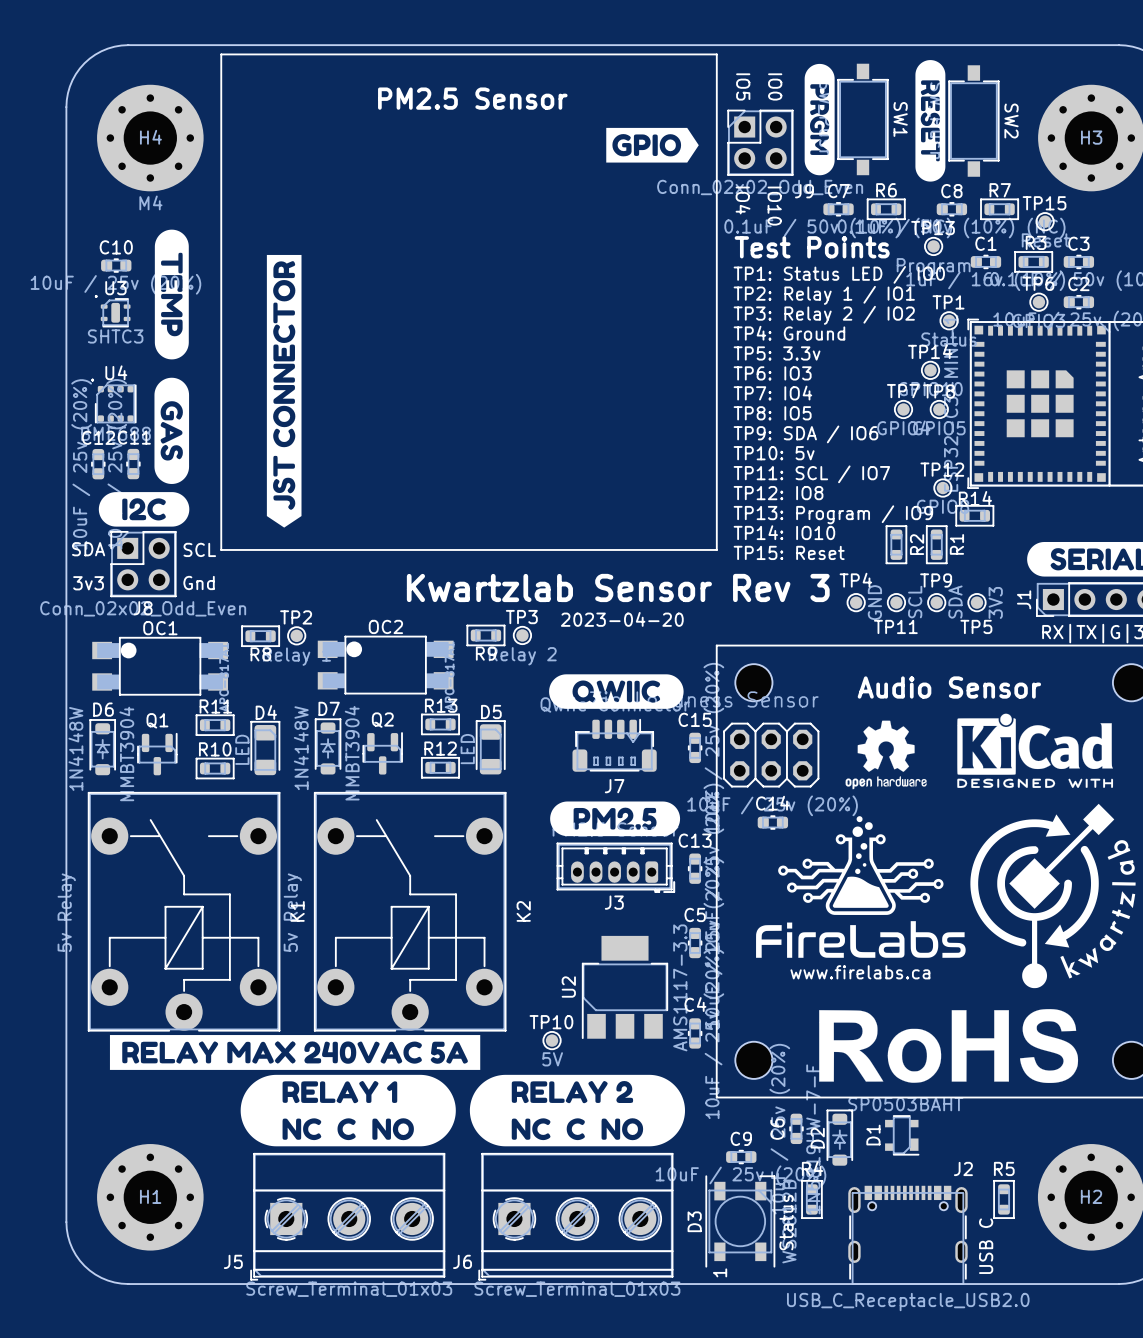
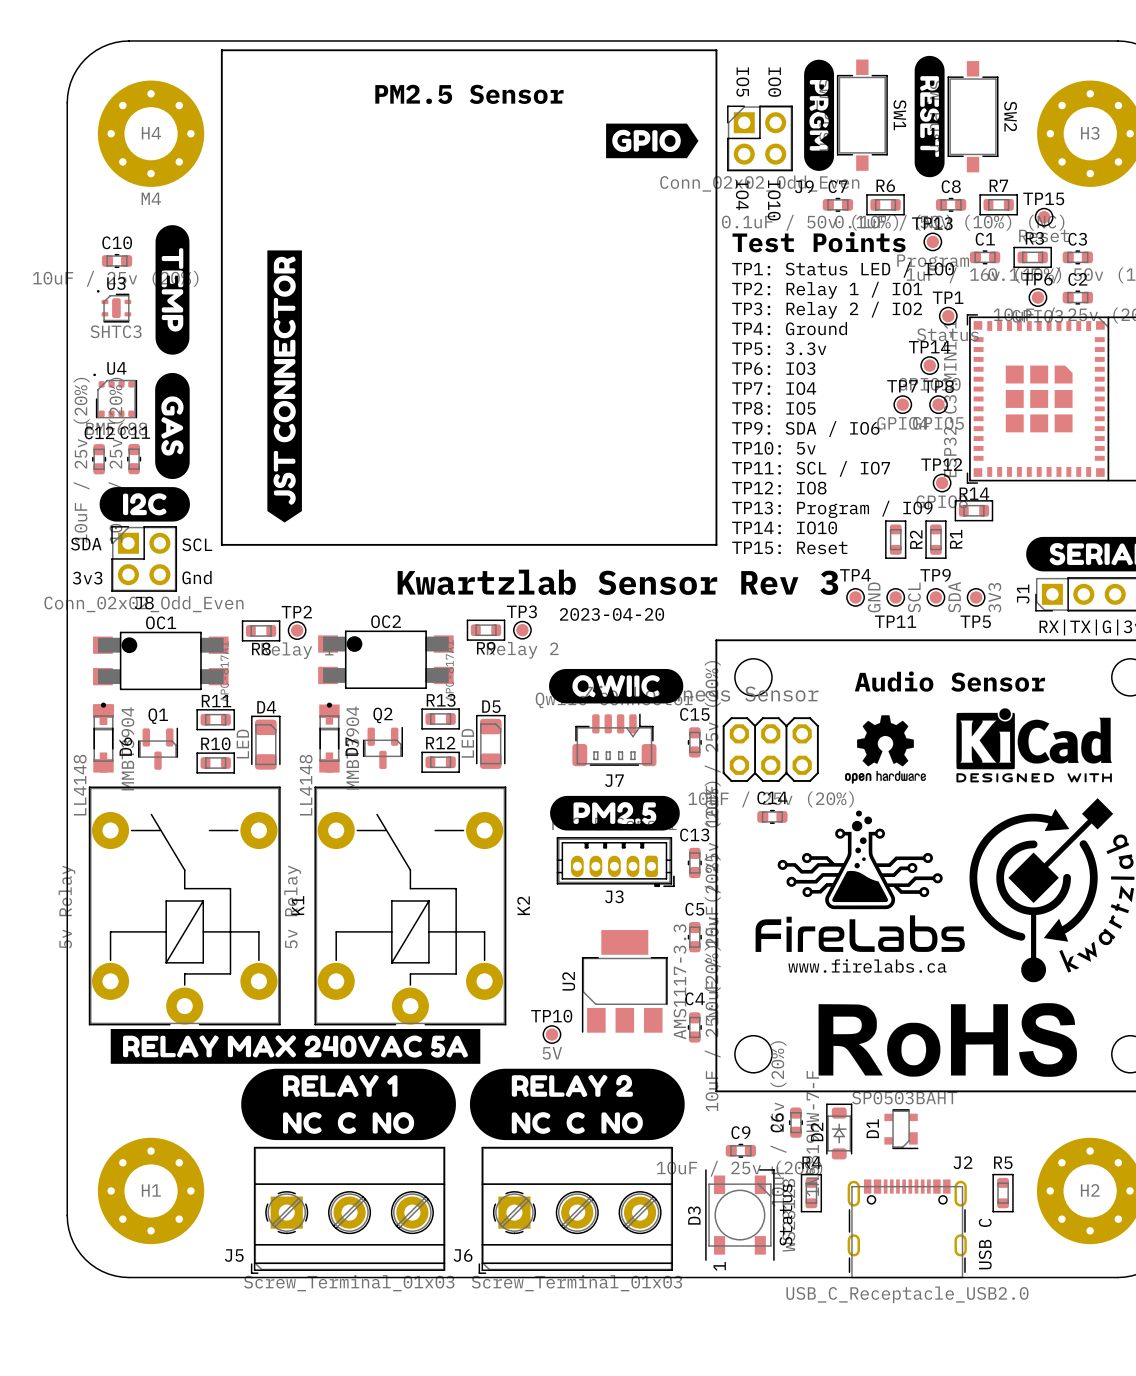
D7 name position: D7 (329, 708) -> D7 (351, 746)
D6 name position: D6 (103, 709) -> D6 (125, 746)
D7 footprint: [314, 718, 342, 775] -> [319, 702, 340, 773]
D6 footprint: [89, 719, 116, 776] -> [93, 702, 114, 773]
part: none -> (103, 714)
D6 value: 1N4148W (75, 748) -> LL4148 (80, 785)
D7 value: 1N4148W (301, 748) -> LL4148 (306, 785)

